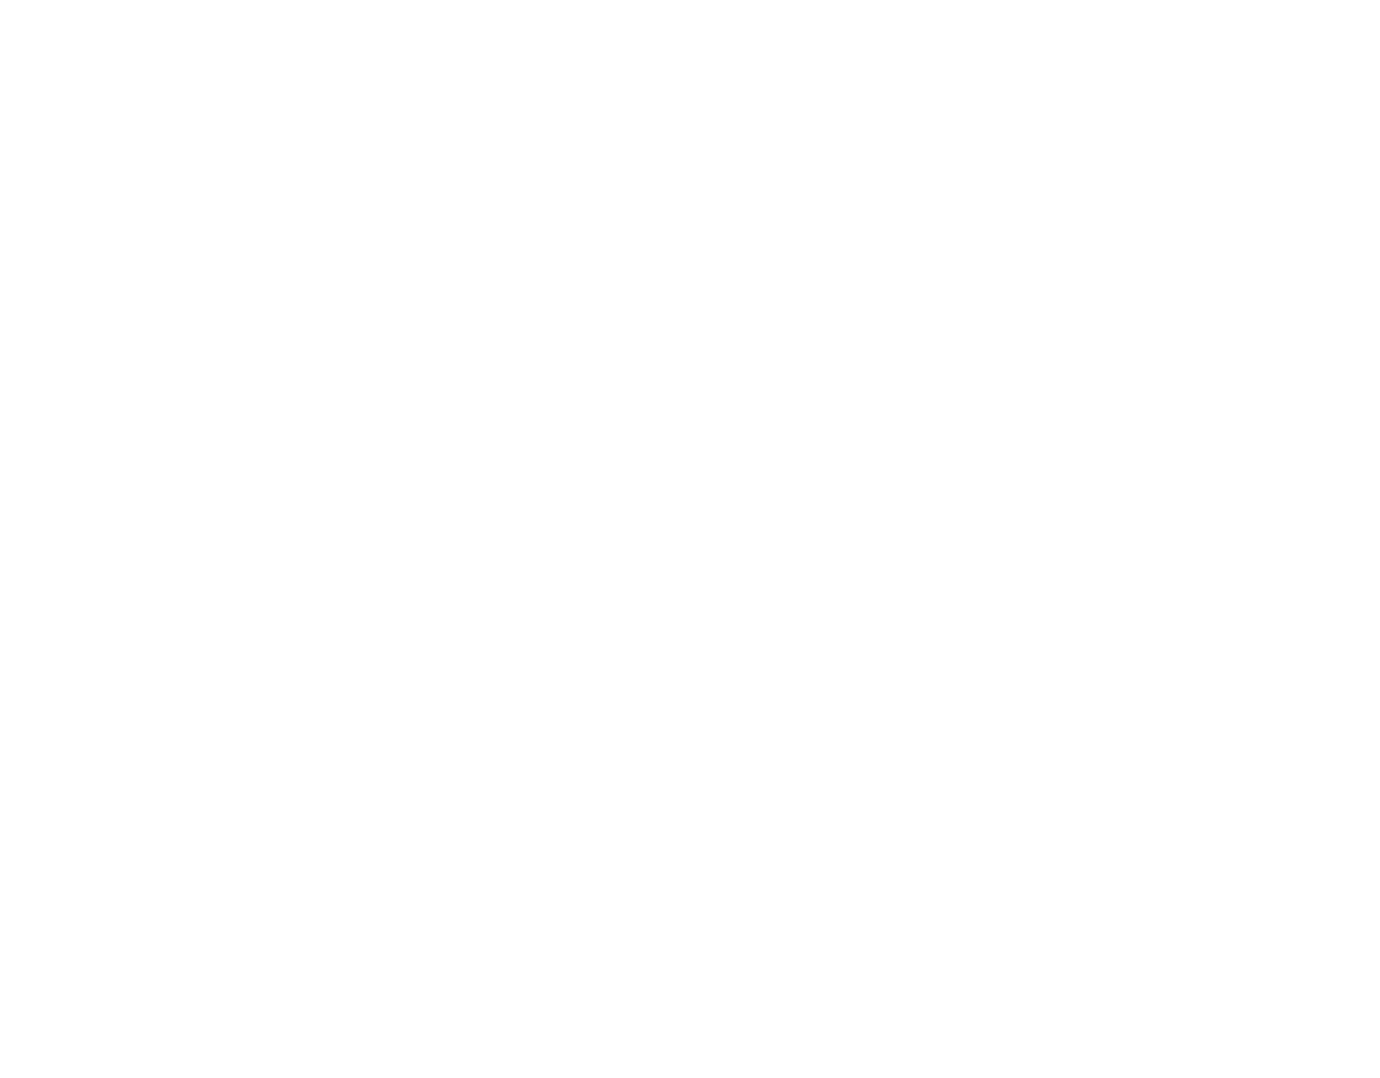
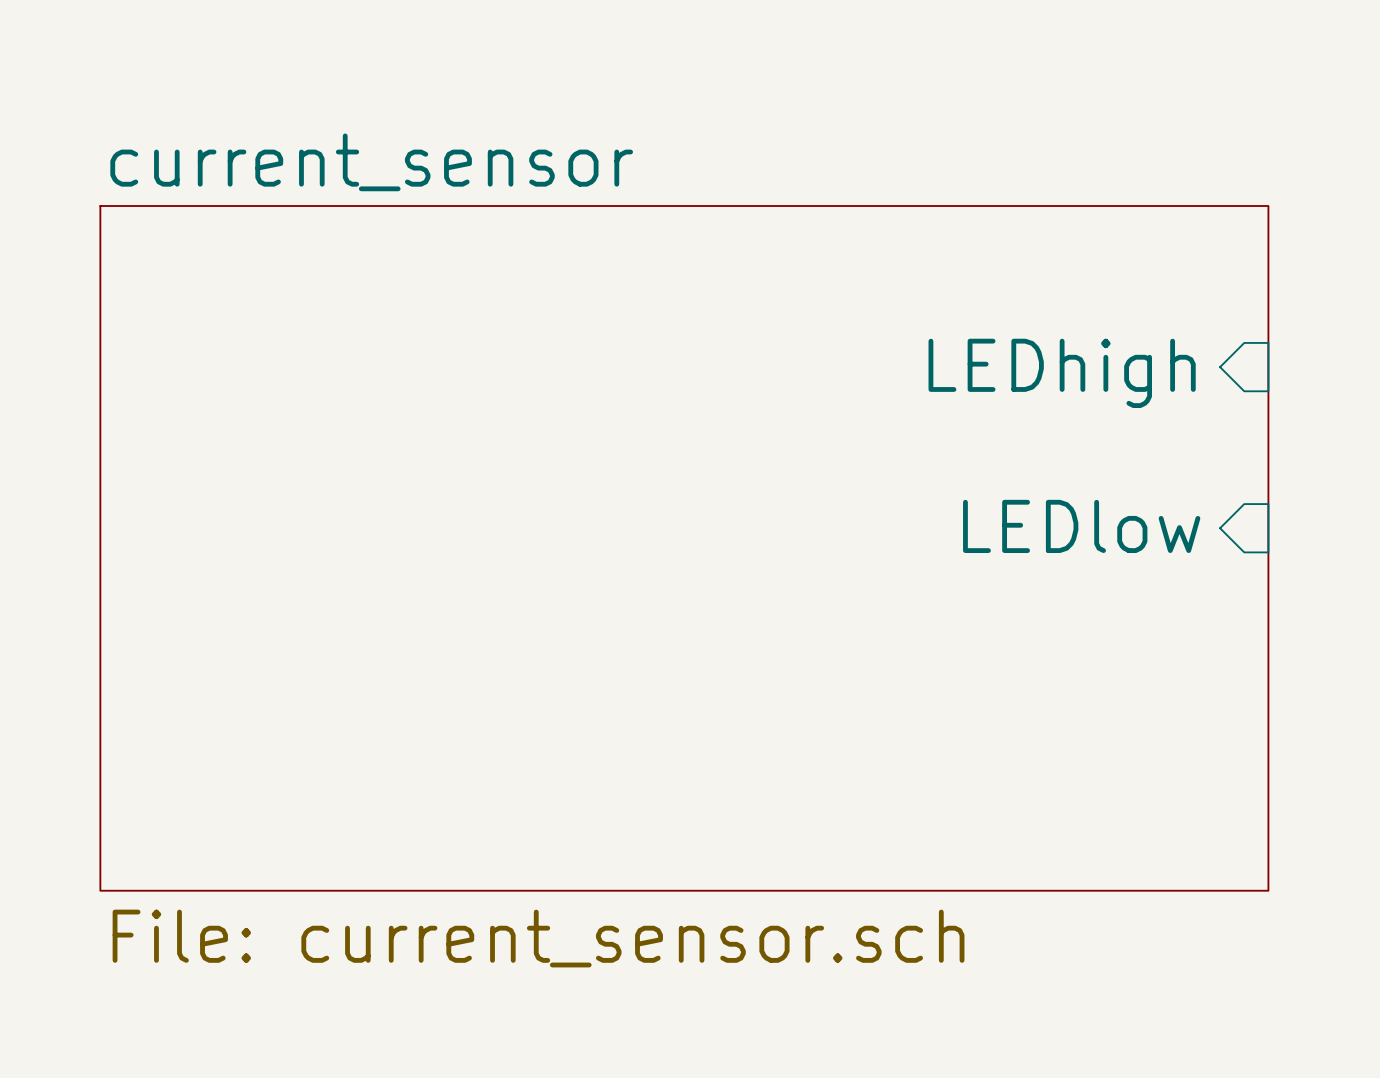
sheet pin: none -> LEDhigh (1062, 373)
sheet pin: none -> LEDlow (1081, 526)
sheet current_sensor: none -> File: current_sensor.sch (684, 548)

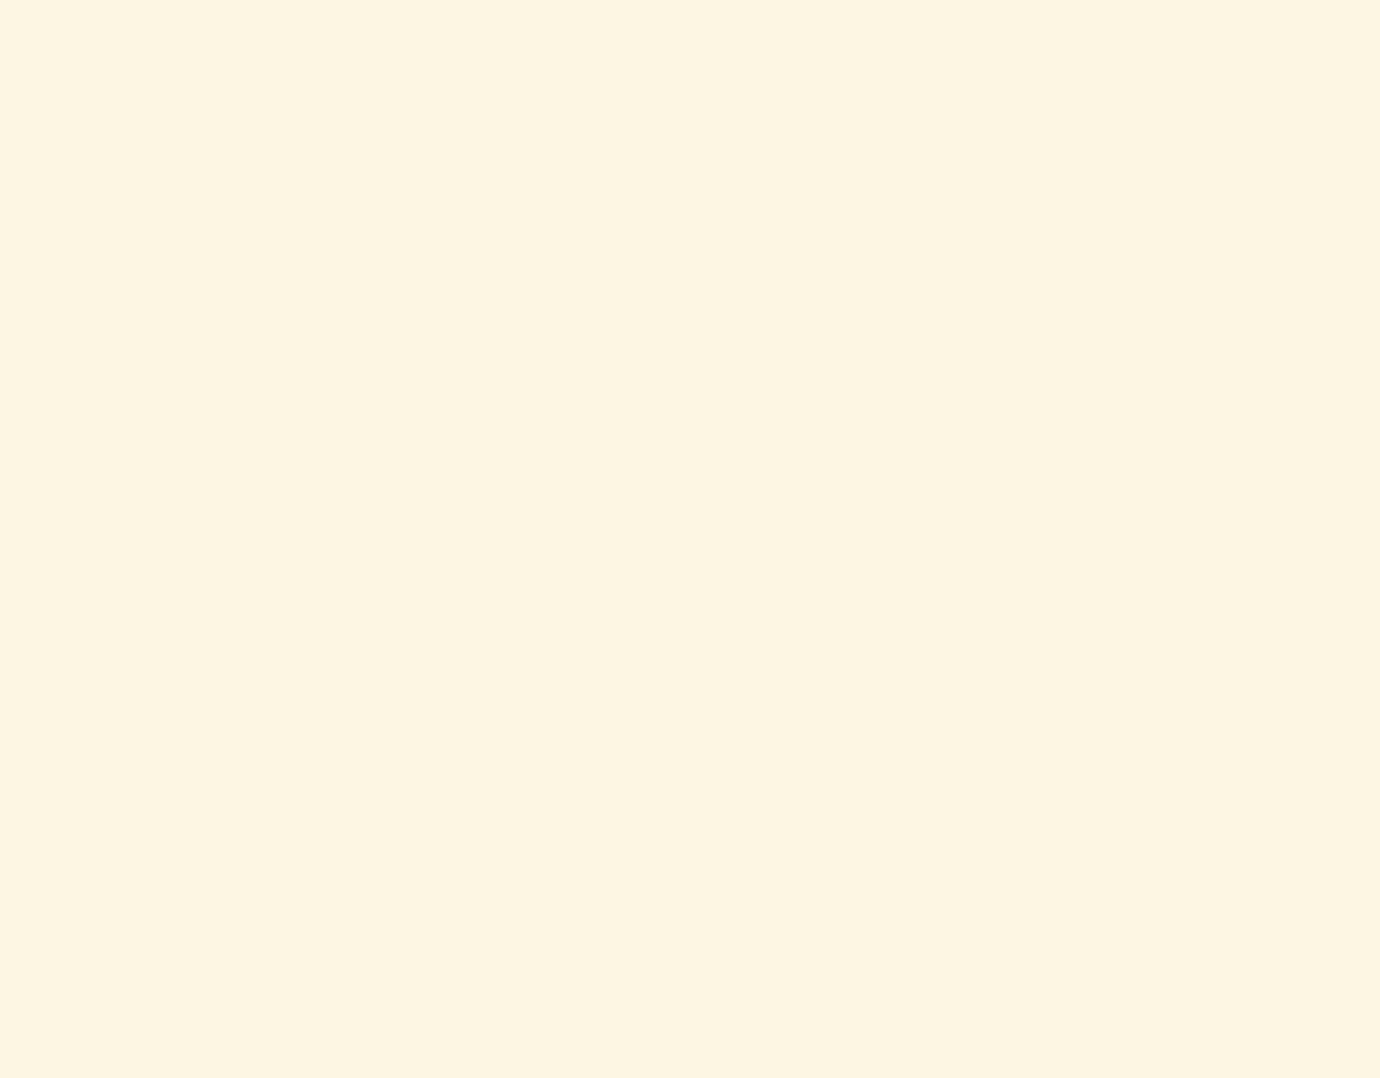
sheet pin: LEDhigh (1062, 373) -> none
sheet pin: LEDlow (1081, 526) -> none
sheet current_sensor: File: current_sensor.sch (684, 548) -> none

